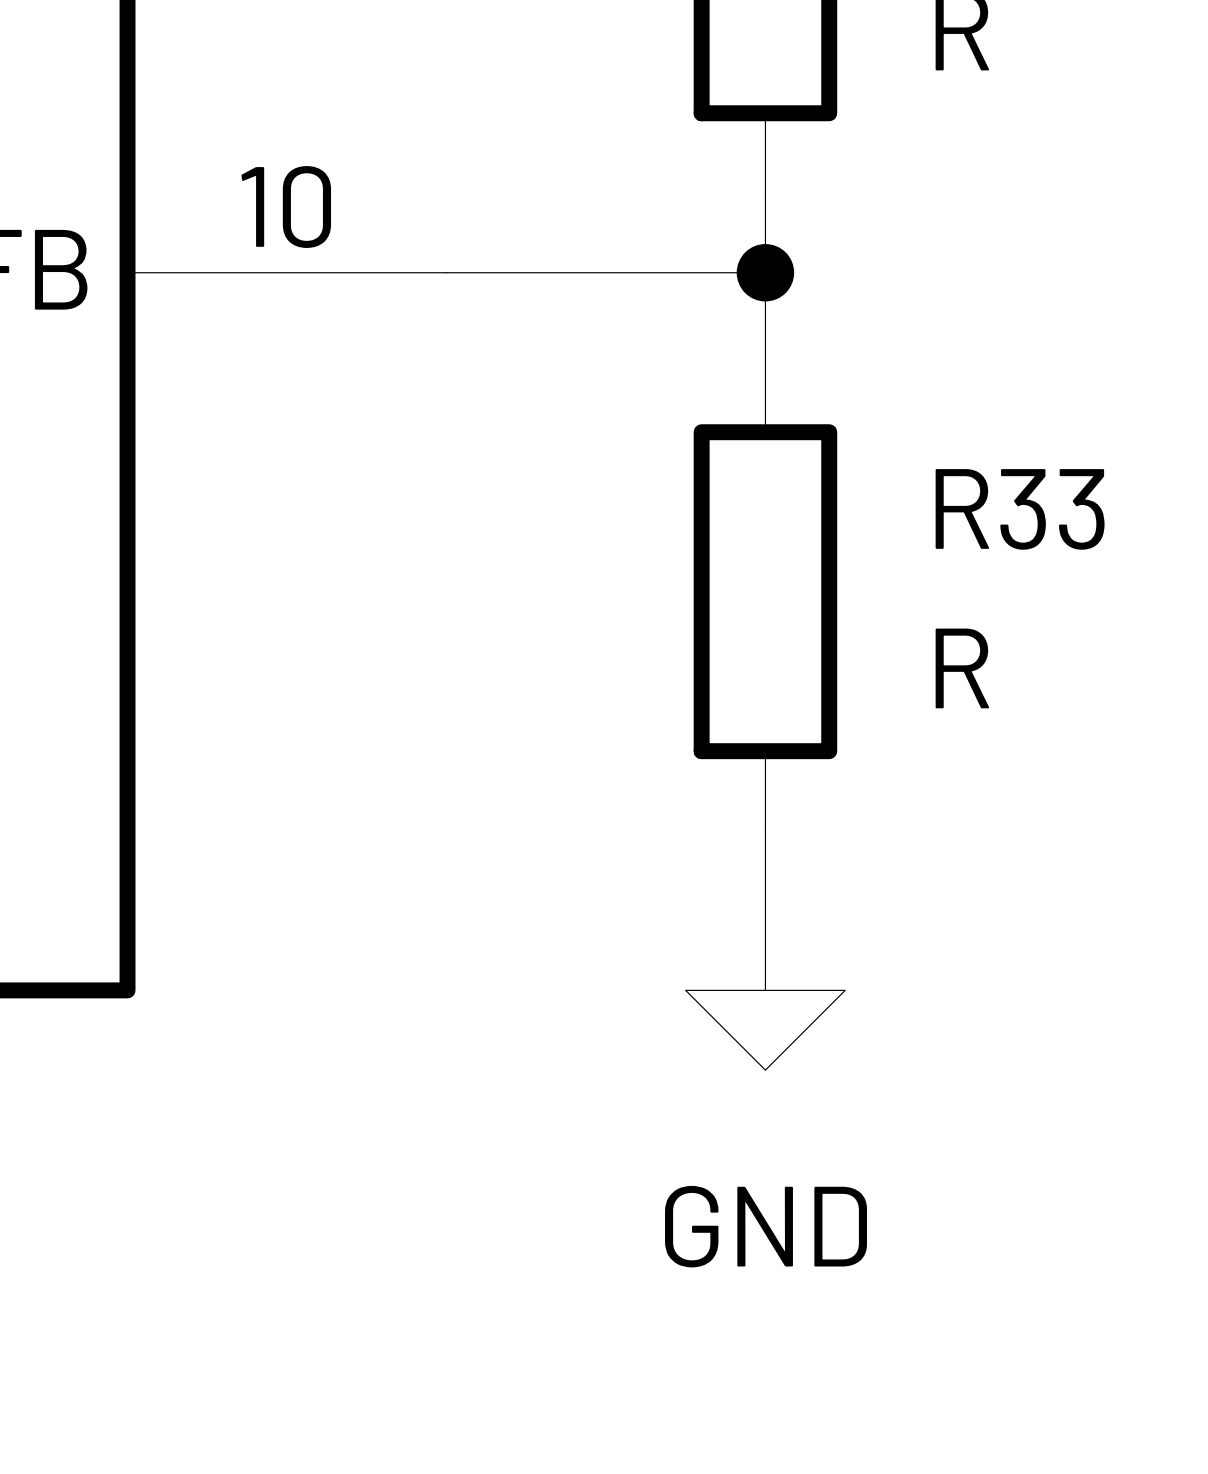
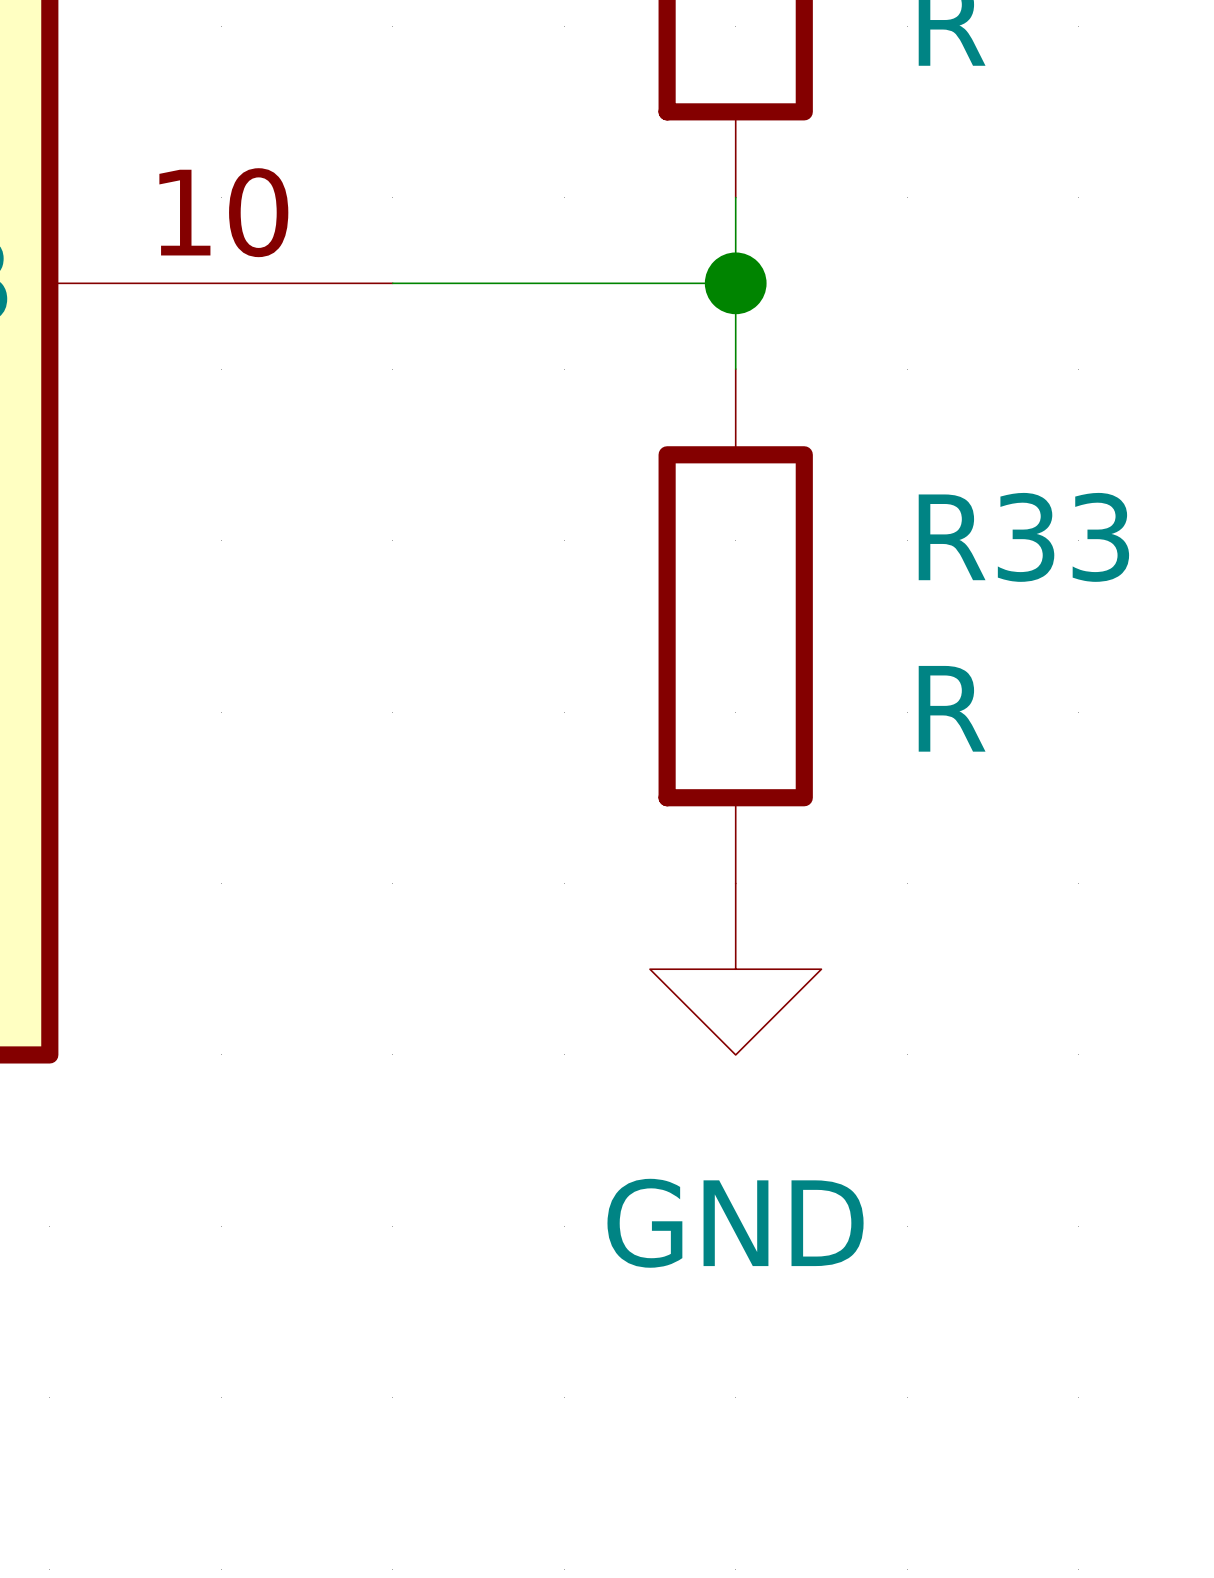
power symbol position: GND (765, 990) -> GND (735, 969)

